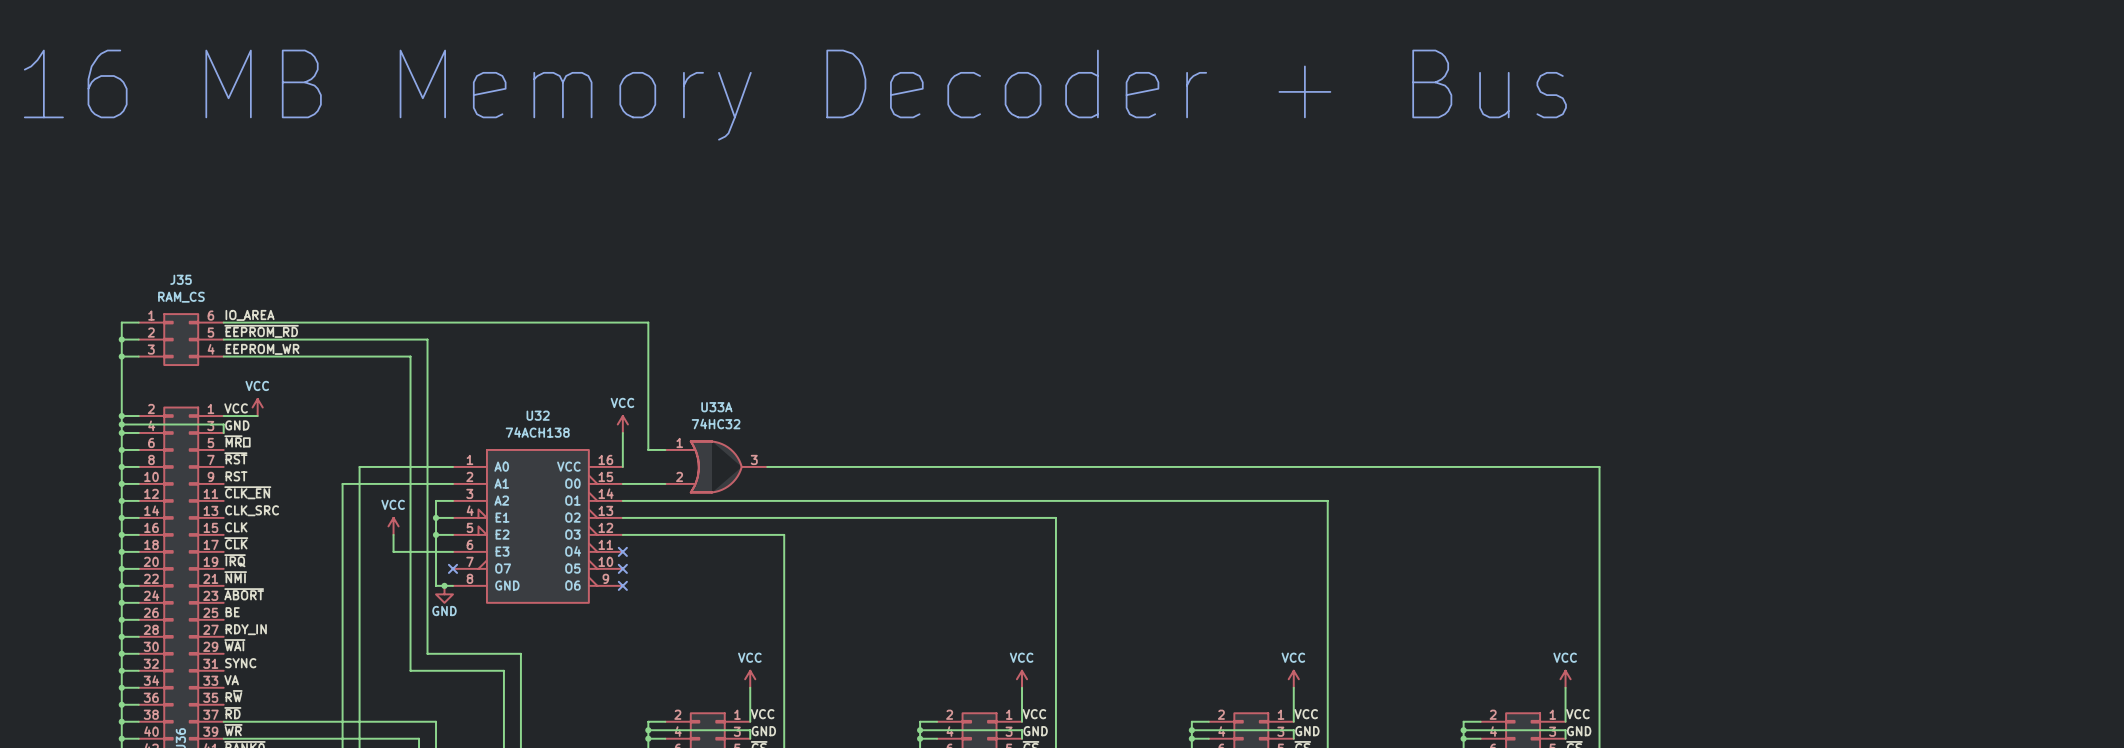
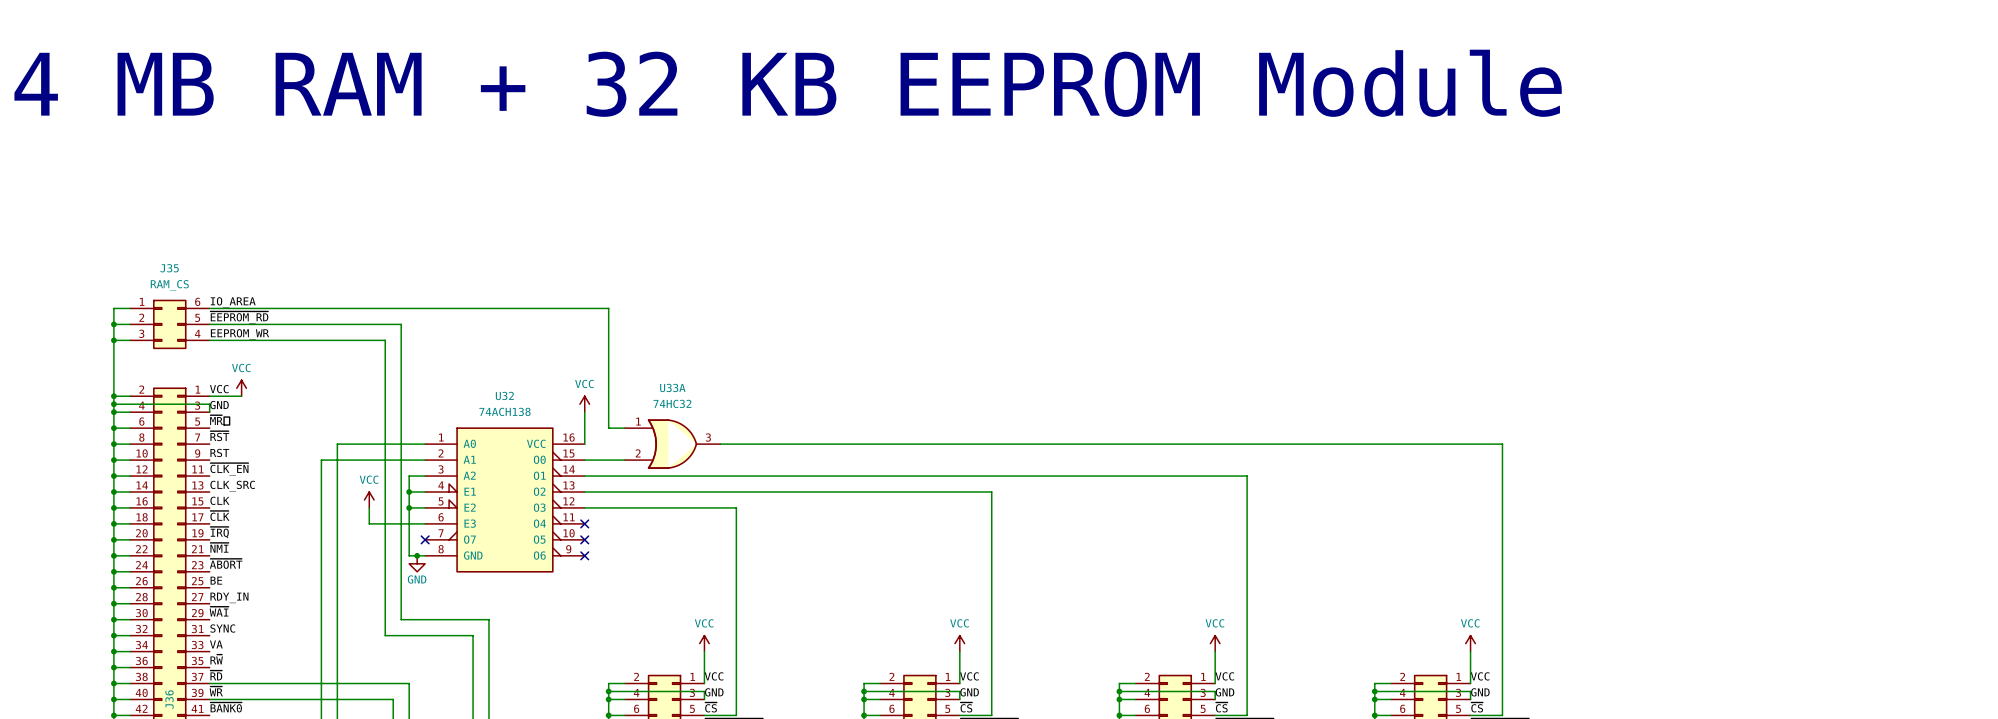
text: 16 MB Memory Decoder + Bus (795, 95) -> 4 MB RAM + 32 KB EEPROM Module (788, 83)

